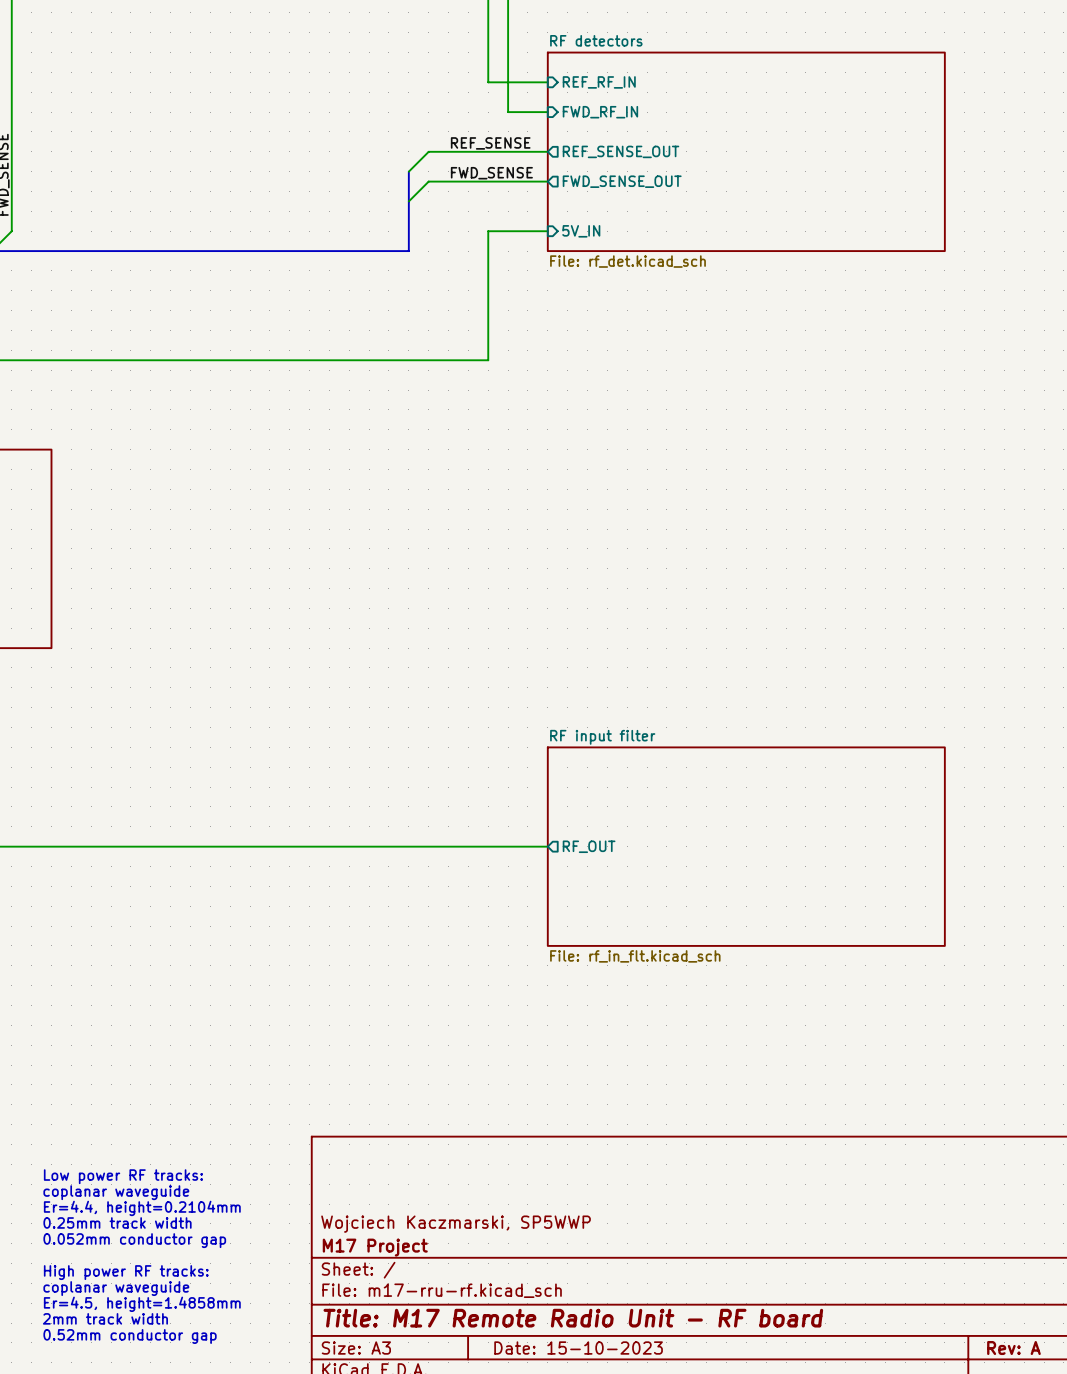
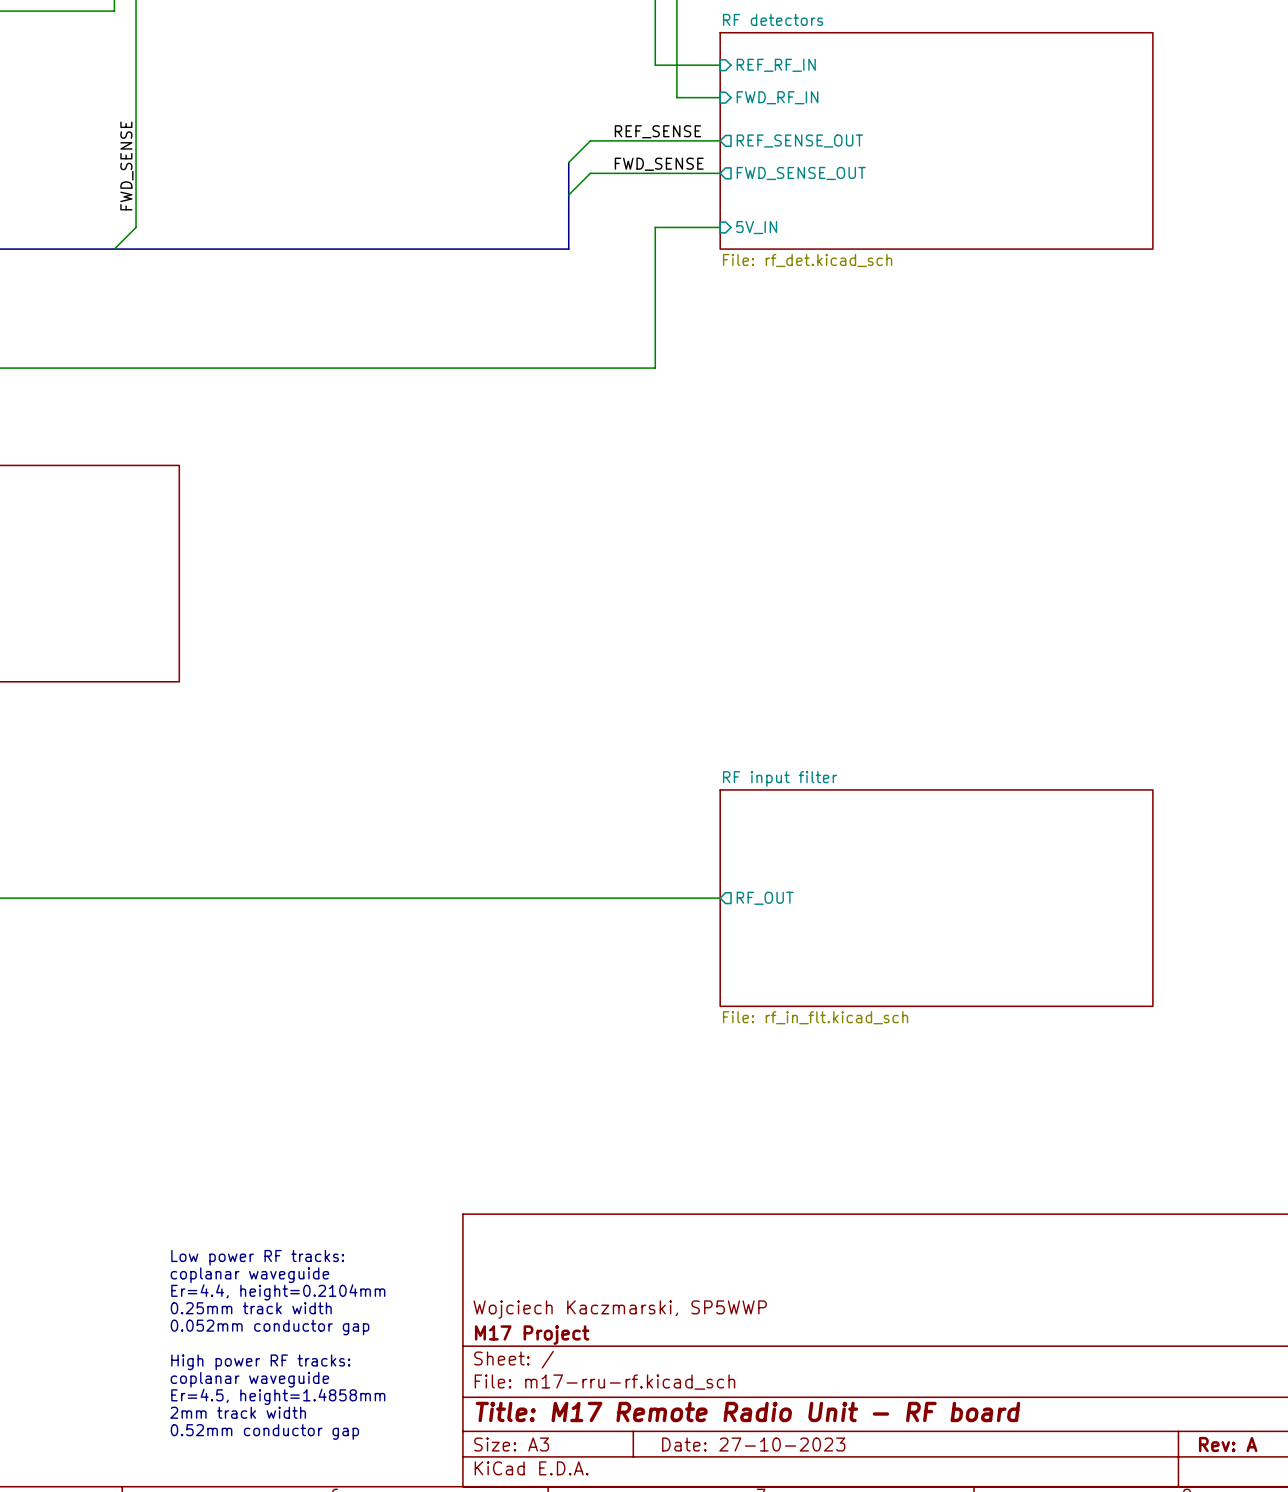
title block: Date: 15-10-2023 (578, 1348) -> Date: 27-10-2023 (753, 1444)

